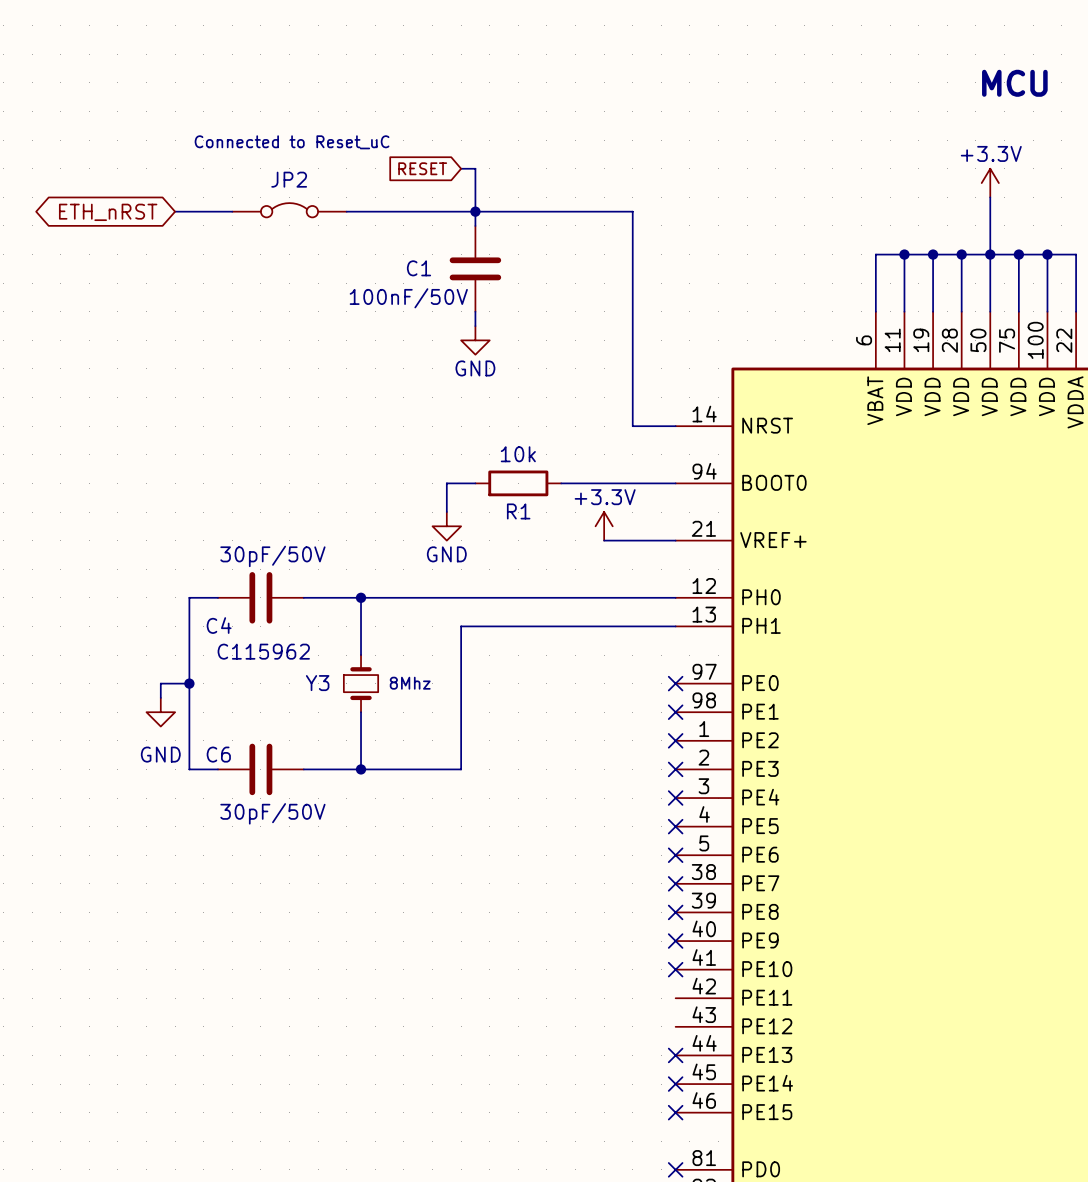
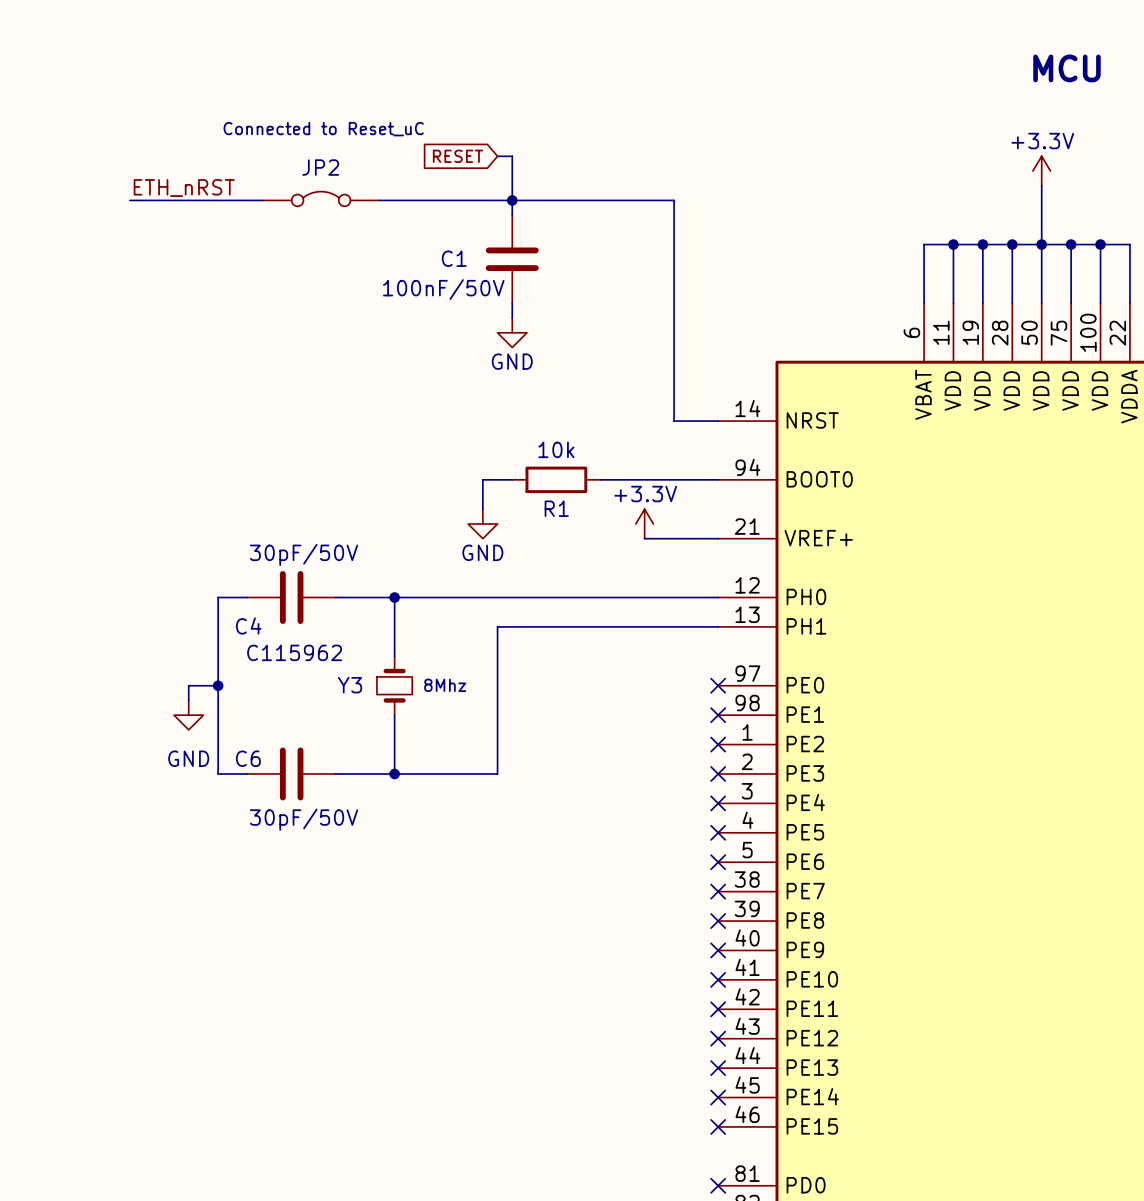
label: none -> ETH_nRST (184, 188)
wire: none -> (129, 200) (203, 200)
global label: ETH_nRST (108, 212) -> none
no-connect mark: none -> (718, 1009)
no-connect mark: none -> (718, 1038)

